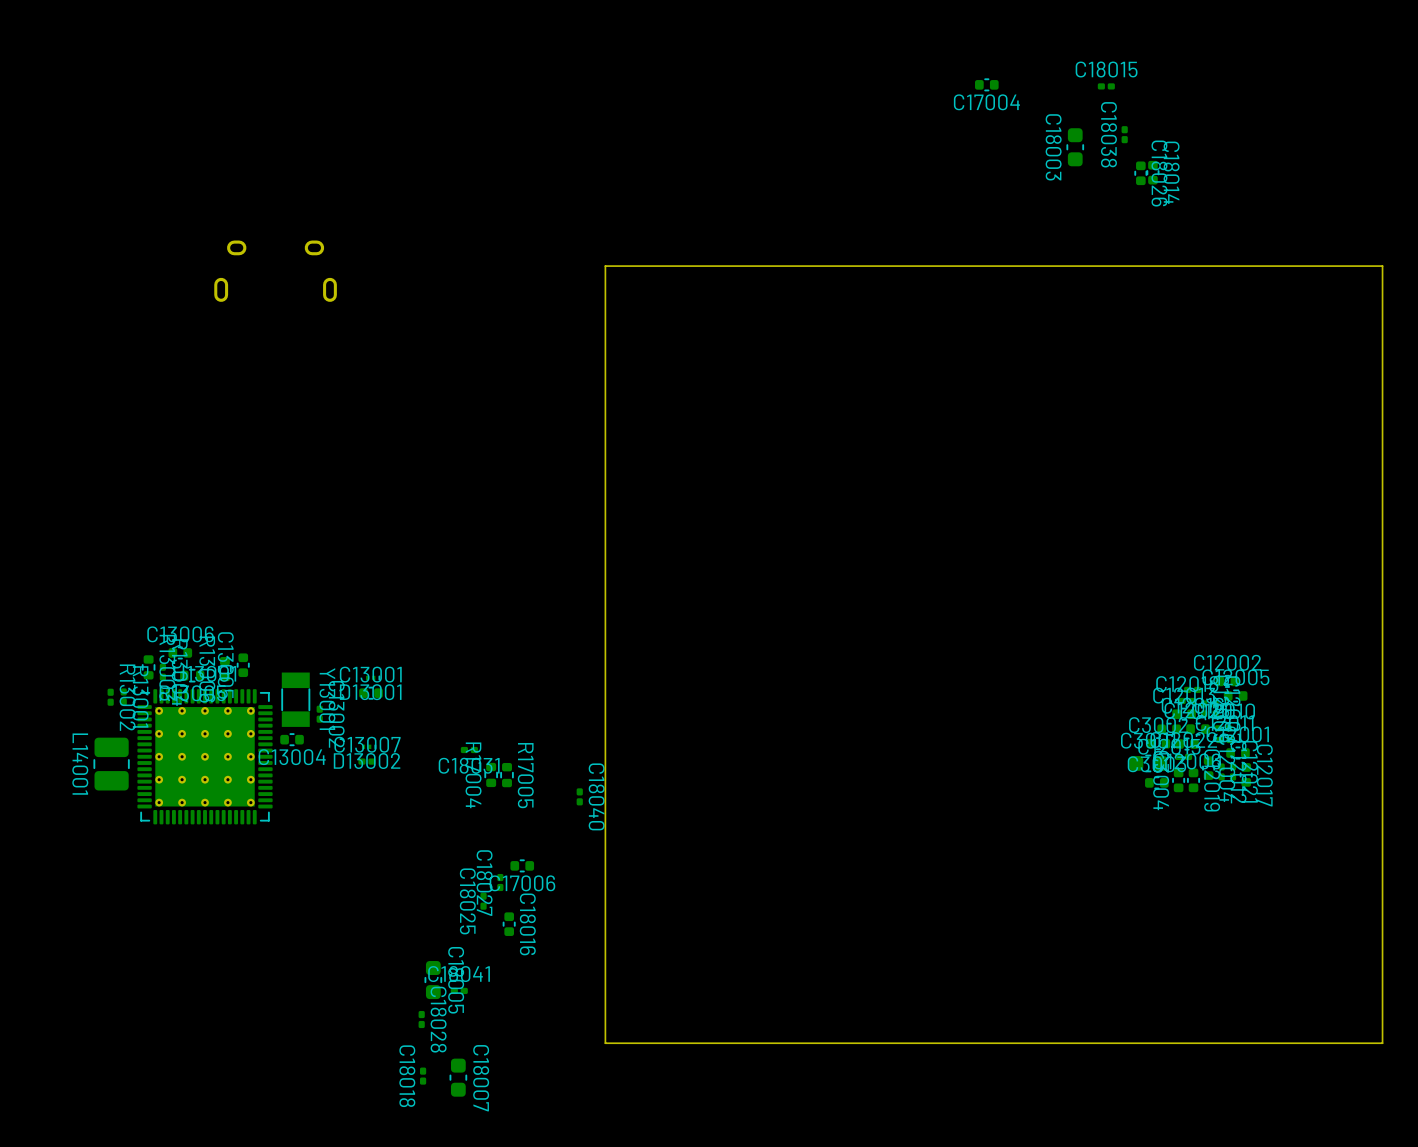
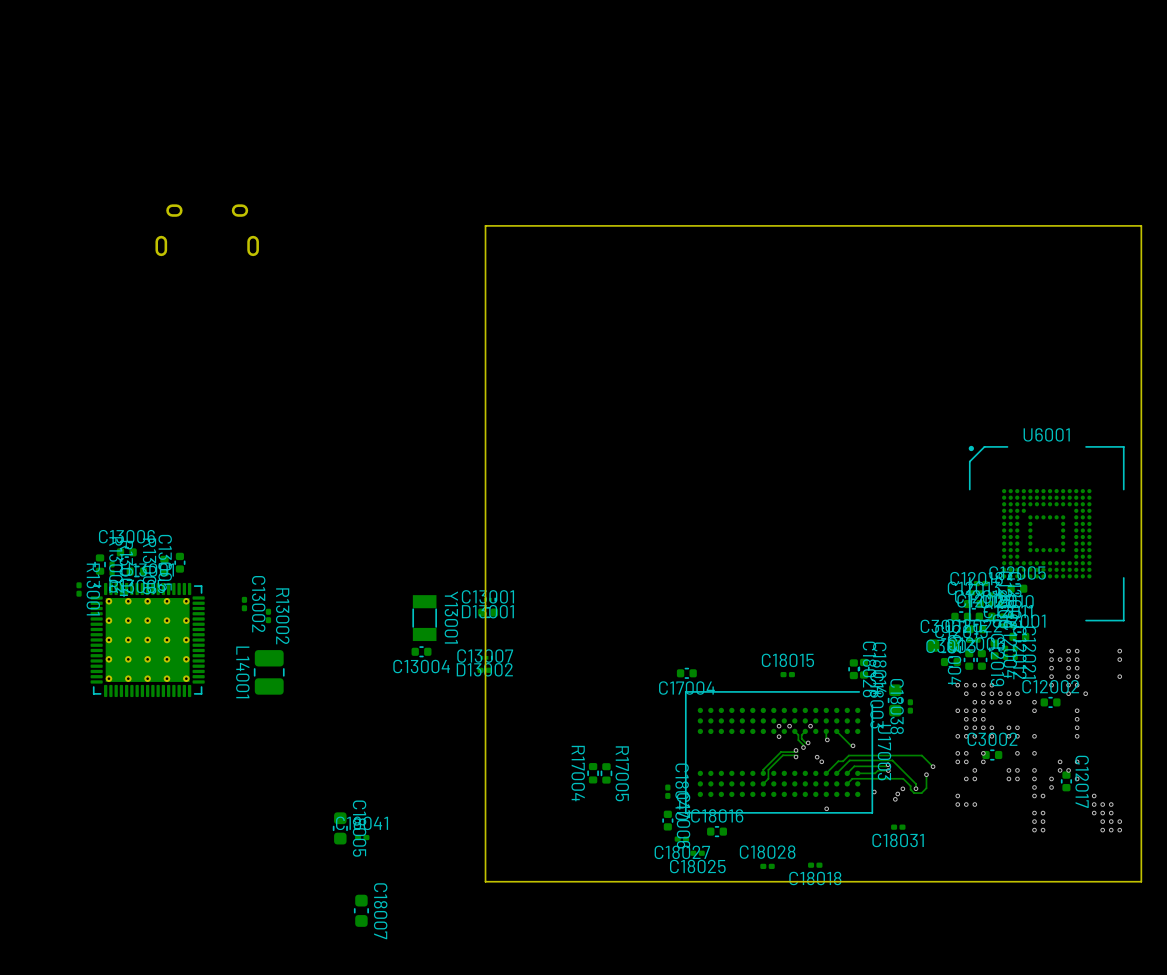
C17004 position: (986, 84) -> (686, 673)
C18015 position: (1106, 86) -> (787, 674)
C18038 position: (1124, 134) -> (910, 706)
C18003 position: (1075, 147) -> (895, 700)
C18014 position: (1152, 172) -> (864, 668)
C18026 position: (1140, 173) -> (853, 669)
U6001: none -> (1046, 533)
D13001 position: (373, 677) -> (489, 599)
C12002 position: (1227, 681) -> (1050, 702)
C13001 position: (371, 693) -> (488, 612)
R13002 position: (110, 697) -> (268, 615)
Y13001 position: (295, 699) -> (424, 618)
C13004 position: (292, 739) -> (421, 651)
C3002 position: (1158, 743) -> (992, 755)
D13002 position: (369, 746) -> (486, 657)
C18031 position: (469, 750) -> (898, 827)
C13007 position: (366, 761) -> (484, 670)
L14001 position: (111, 764) -> (269, 672)
via: none -> (1051, 651)
via: none -> (1068, 651)
via: none -> (1077, 651)
via: none -> (1119, 651)
R17004 position: (491, 774) -> (593, 773)
C12017 position: (1246, 774) -> (1066, 781)
R17005 position: (507, 775) -> (606, 773)
via: none -> (1051, 659)
via: none -> (1060, 659)
via: none -> (1068, 659)
via: none -> (1077, 659)
via: none -> (1119, 659)
via: none -> (1051, 668)
via: none -> (1068, 668)
via: none -> (1077, 668)
C18040 position: (579, 796) -> (667, 791)
via: none -> (1051, 676)
via: none -> (1068, 676)
via: none -> (1077, 676)
via: none -> (1119, 676)
via: none -> (957, 685)
via: none -> (966, 685)
via: none -> (974, 685)
via: none -> (983, 685)
via: none -> (991, 685)
via: none -> (1051, 685)
via: none -> (1068, 685)
via: none -> (1077, 685)
via: none -> (966, 693)
via: none -> (983, 693)
via: none -> (991, 693)
via: none -> (1000, 693)
via: none -> (1008, 693)
via: none -> (1017, 693)
via: none -> (1068, 693)
via: none -> (1085, 693)
via: none -> (974, 702)
via: none -> (983, 702)
via: none -> (991, 702)
via: none -> (1000, 702)
via: none -> (1008, 702)
via: none -> (1034, 702)
via: none -> (957, 710)
via: none -> (966, 710)
via: none -> (974, 710)
via: none -> (983, 710)
via: none -> (1034, 710)
via: none -> (1077, 710)
via: none -> (966, 719)
via: none -> (974, 719)
via: none -> (983, 719)
via: none -> (1077, 719)
via: none -> (779, 726)
via: none -> (789, 726)
via: none -> (810, 726)
via: none -> (966, 727)
via: none -> (974, 727)
via: none -> (983, 727)
via: none -> (991, 727)
via: none -> (1008, 727)
via: none -> (1017, 727)
via: none -> (1077, 727)
C17006 rotation: 0° (522, 865) -> 90° clockwise (667, 820)
C17006 position: (522, 865) -> (667, 820)
track: none -> (794, 731) (803, 747)
track: none -> (805, 731) (801, 735) (801, 738) (808, 742)
track: none -> (826, 731) (827, 739)
track: none -> (836, 731) (853, 745)
via: none -> (957, 736)
via: none -> (966, 736)
via: none -> (974, 736)
via: none -> (991, 736)
via: none -> (1008, 736)
via: none -> (1017, 736)
via: none -> (1034, 736)
via: none -> (1077, 736)
via: none -> (779, 736)
via: none -> (827, 739)
via: none -> (808, 742)
C18027 rotation: 0° (500, 882) -> 90° clockwise (681, 839)
C18027 position: (500, 882) -> (681, 839)
via: none -> (853, 745)
via: none -> (803, 747)
via: none -> (796, 750)
U17003: none -> (779, 752)
track: none -> (797, 752) (796, 750) (781, 752) (763, 769) (763, 773)
via: none -> (957, 753)
via: none -> (966, 753)
via: none -> (983, 753)
via: none -> (1017, 753)
via: none -> (1034, 753)
track: none -> (797, 755) (796, 756) (782, 755) (768, 769) (768, 778) (763, 783)
via: none -> (796, 756)
via: none -> (817, 757)
C18025 rotation: 0° (483, 901) -> 90° clockwise (697, 853)
C18025 position: (483, 901) -> (697, 853)
via: none -> (821, 761)
via: none -> (957, 761)
via: none -> (966, 761)
via: none -> (983, 761)
via: none -> (1060, 761)
via: none -> (1077, 761)
track: none -> (888, 764) (886, 766) (854, 766) (847, 773)
via: none -> (888, 764)
track: none -> (933, 766) (921, 755) (848, 755) (843, 761) (838, 761) (826, 773)
via: none -> (933, 766)
track: none -> (888, 770) (877, 770) (875, 773) (857, 773)
via: none -> (888, 770)
via: none -> (974, 770)
via: none -> (1008, 770)
via: none -> (1017, 770)
via: none -> (1034, 770)
via: none -> (1060, 770)
via: none -> (1068, 770)
track: none -> (836, 773) (849, 760) (892, 760) (915, 784) (915, 788)
track: none -> (926, 774) (926, 788) (921, 793) (914, 793) (903, 778) (852, 778) (847, 783)
via: none -> (926, 774)
via: none -> (966, 778)
via: none -> (974, 778)
via: none -> (1008, 778)
via: none -> (1017, 778)
via: none -> (1034, 778)
via: none -> (1051, 778)
via: none -> (1077, 778)
C18016 rotation: 0° (509, 924) -> 90° clockwise (717, 831)
C18016 position: (509, 924) -> (717, 831)
via: none -> (1034, 787)
via: none -> (1051, 787)
via: none -> (902, 788)
via: none -> (915, 788)
via: none -> (874, 792)
via: none -> (897, 793)
via: none -> (957, 796)
via: none -> (1034, 796)
via: none -> (1043, 796)
via: none -> (1094, 796)
via: none -> (895, 799)
via: none -> (957, 804)
via: none -> (966, 804)
via: none -> (974, 804)
via: none -> (1094, 804)
via: none -> (1102, 804)
via: none -> (1111, 804)
via: none -> (826, 808)
via: none -> (1034, 813)
via: none -> (1043, 813)
via: none -> (1094, 813)
via: none -> (1102, 813)
via: none -> (1111, 813)
via: none -> (1034, 821)
via: none -> (1043, 821)
via: none -> (1102, 821)
via: none -> (1111, 821)
via: none -> (1119, 821)
via: none -> (1034, 830)
via: none -> (1043, 830)
via: none -> (1102, 830)
via: none -> (1111, 830)
via: none -> (1119, 830)
C18028 rotation: 0° (421, 1019) -> 90° clockwise (767, 866)
C18028 position: (421, 1019) -> (767, 866)
C18018 rotation: 0° (423, 1076) -> 90° clockwise (815, 865)
C18018 position: (423, 1076) -> (815, 865)

